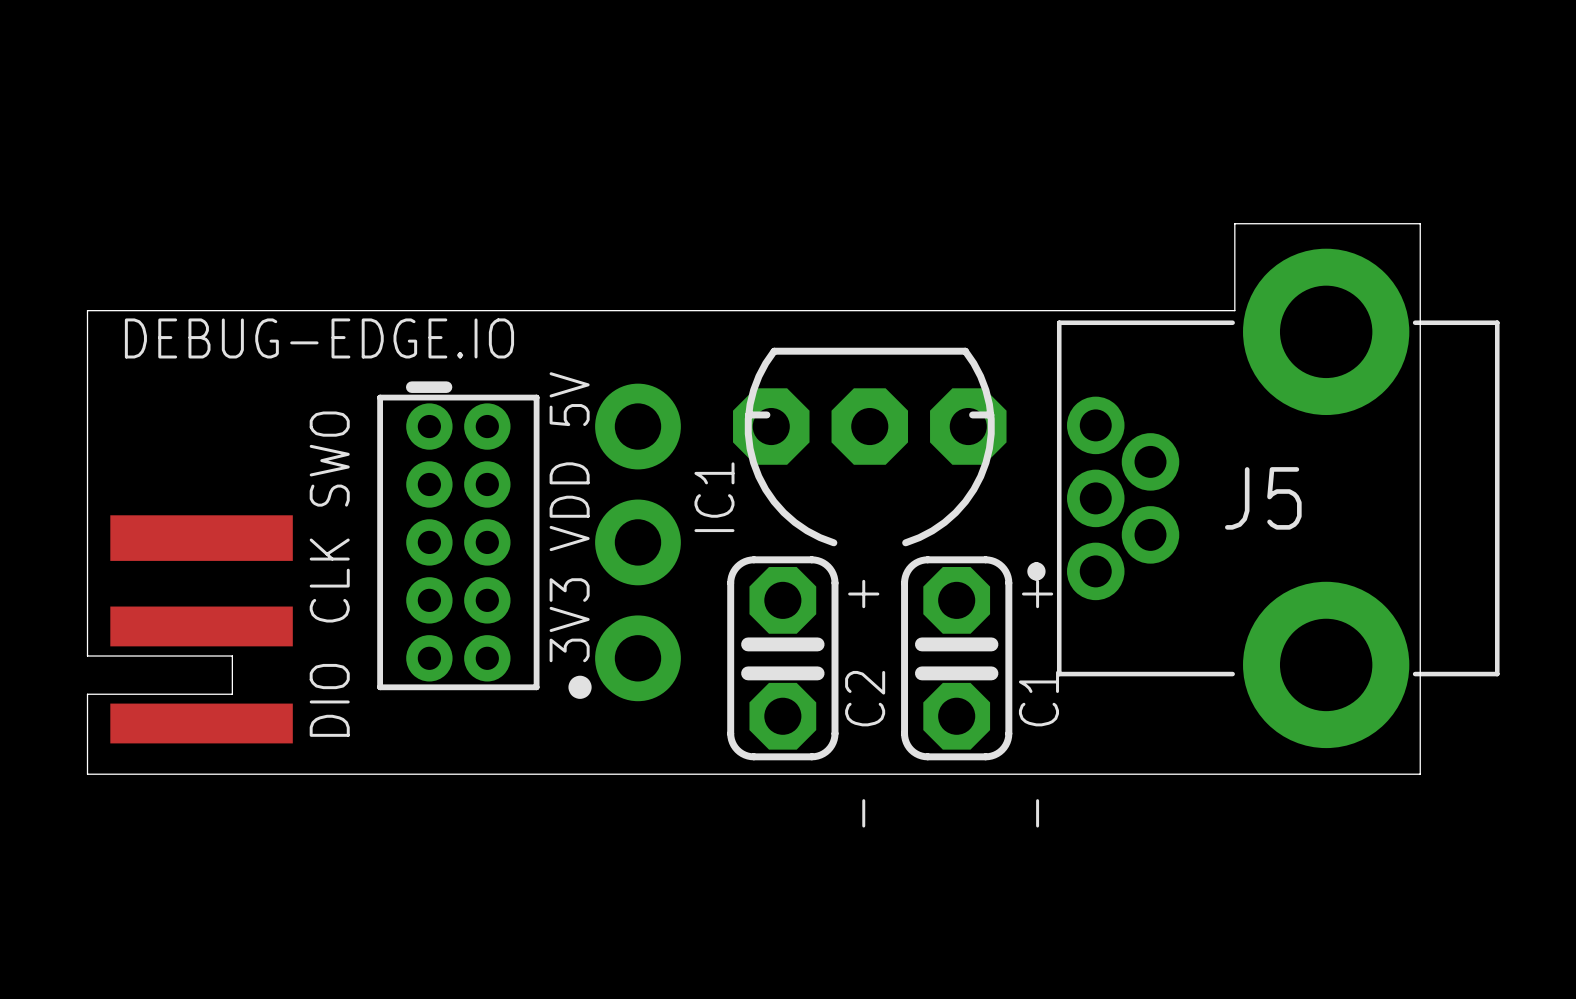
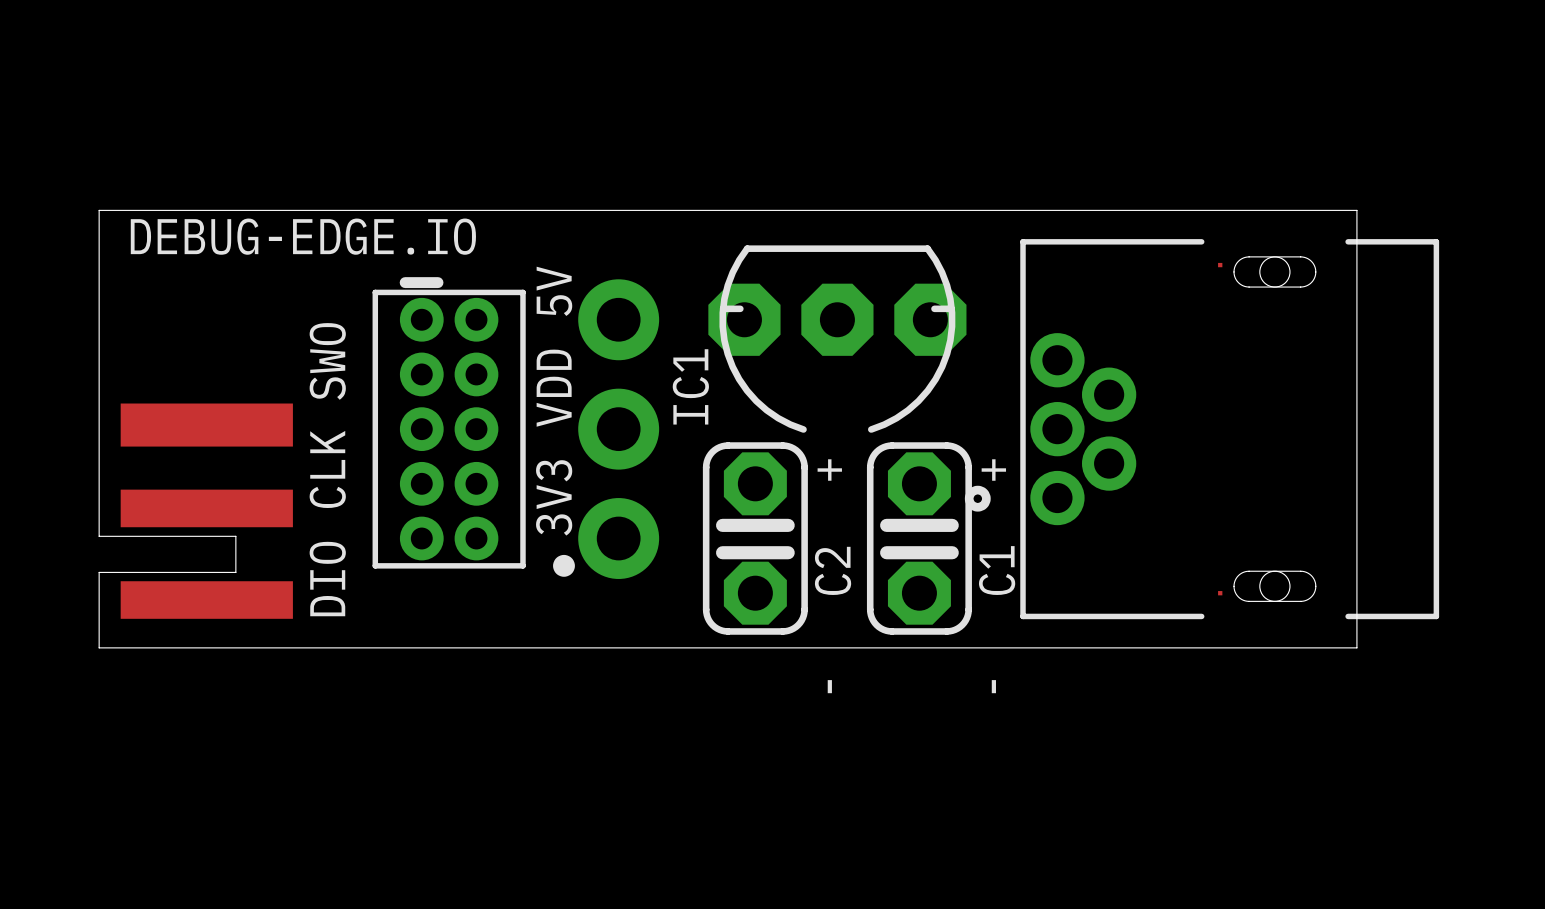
board edge: (1234, 310) (1234, 223) (1420, 223) (1420, 310) -> (1181, 210) (1356, 210)
J5: (1263, 498) -> none
part: none -> (1201, 429)

